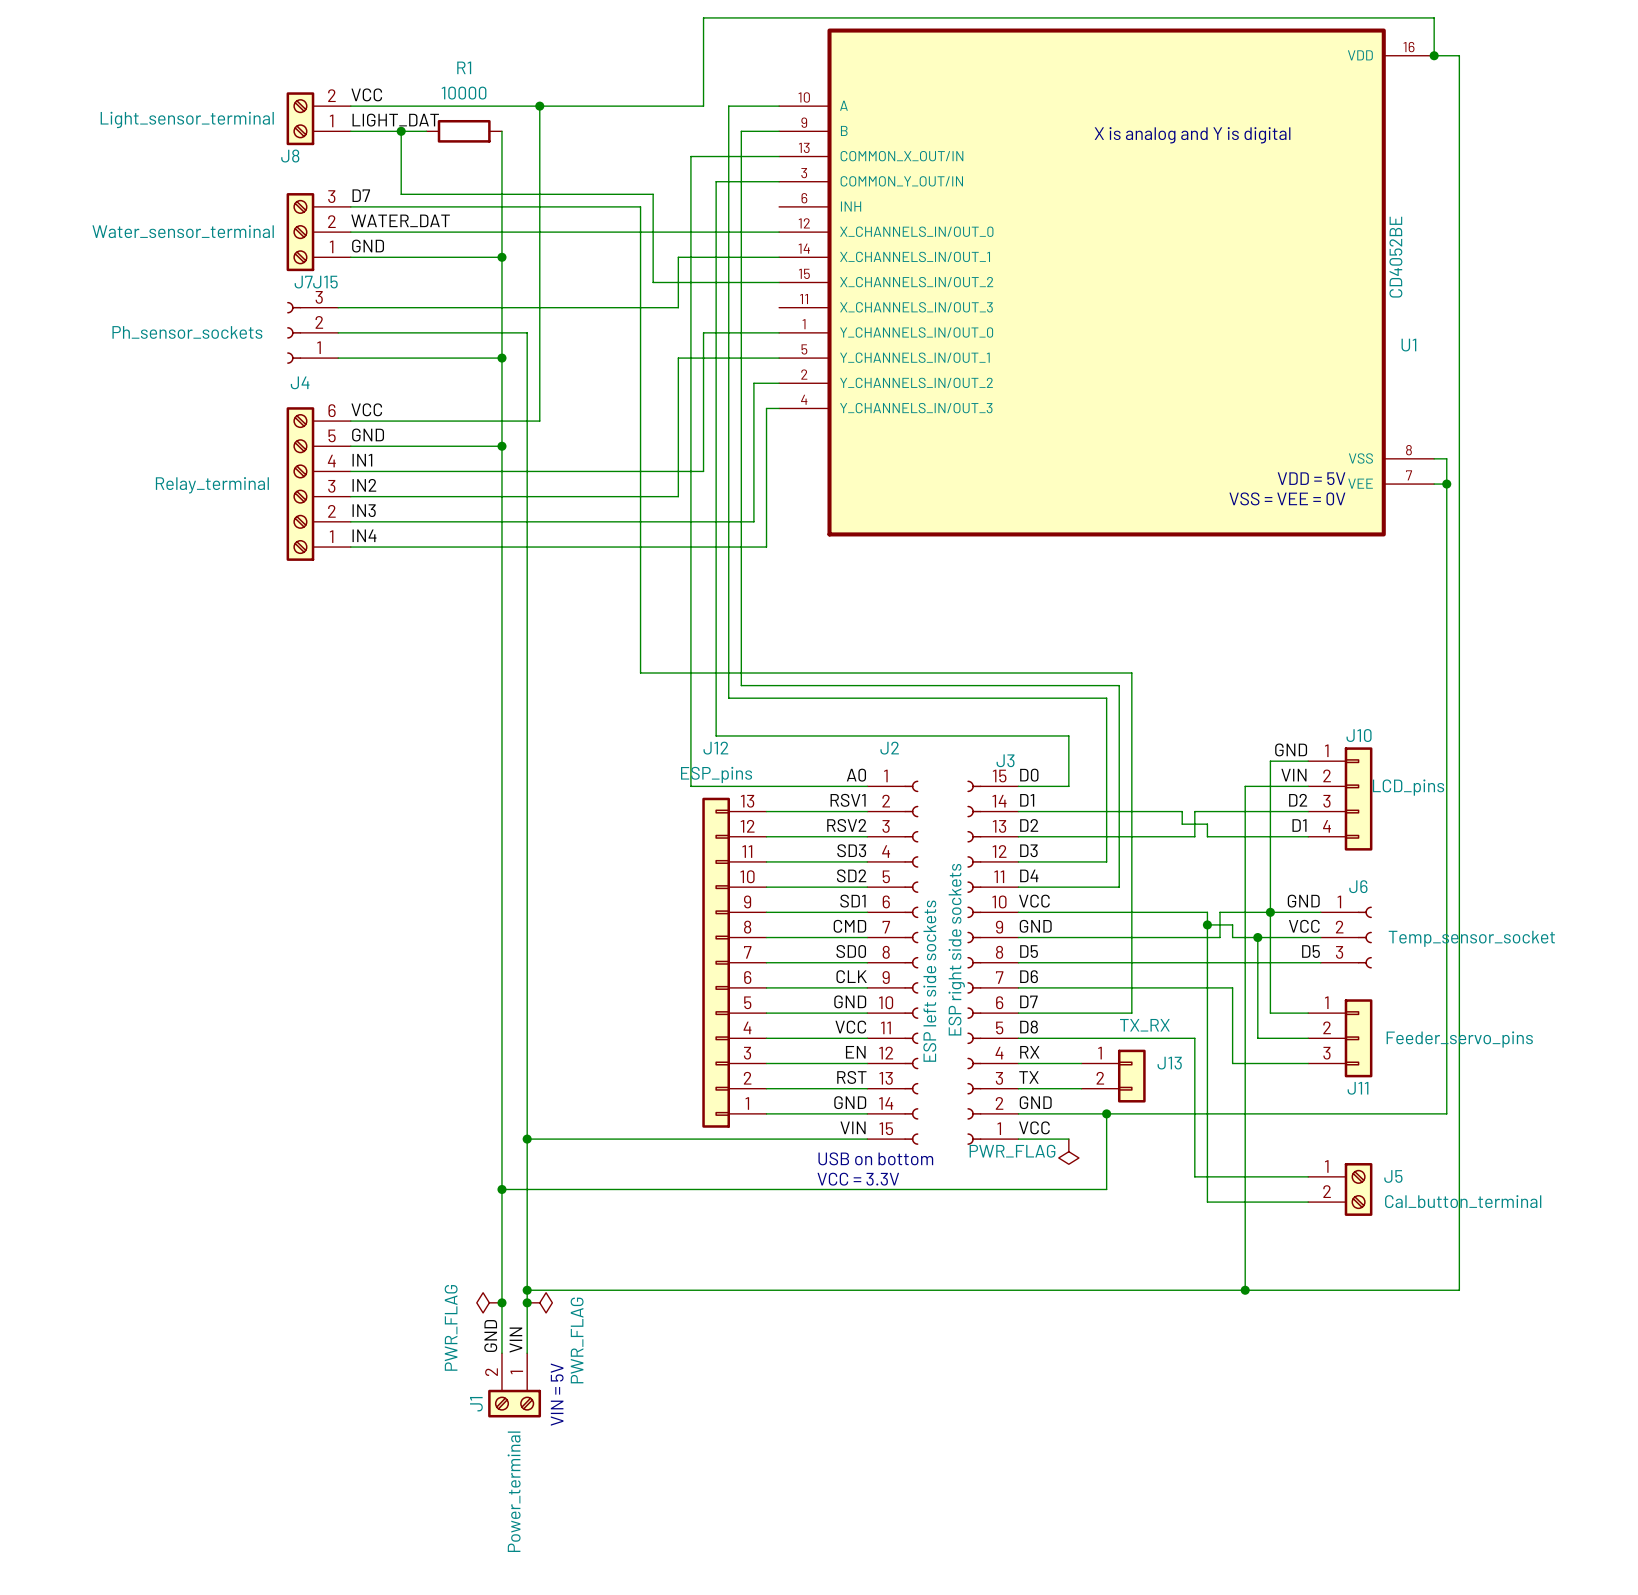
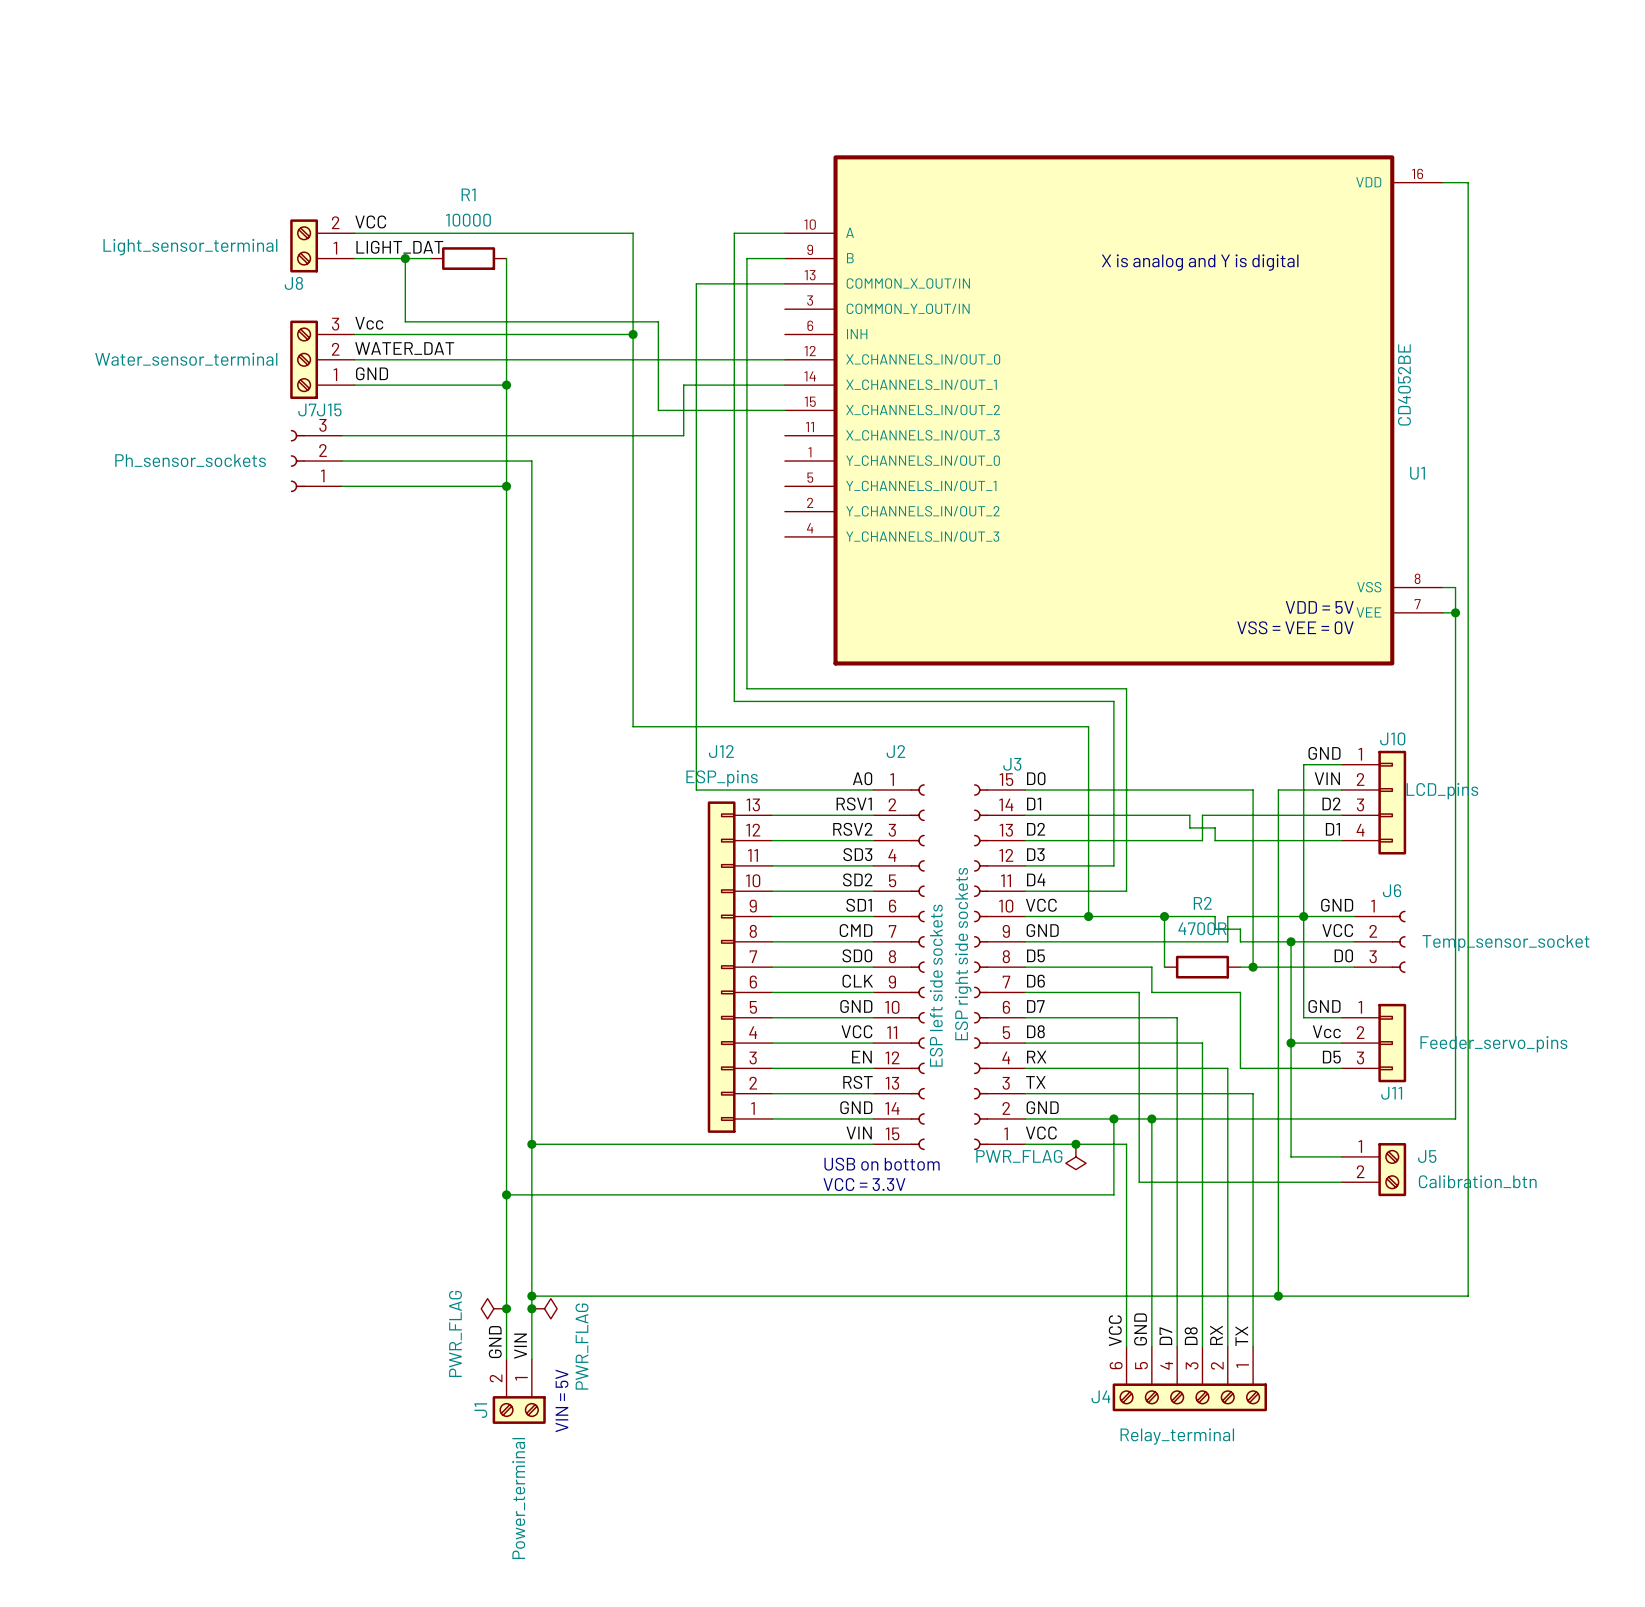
junction: (1434, 55) -> none
label: VCC (366, 94) -> none
wire: (350, 106) (703, 106) (703, 17) (1434, 17) (1434, 55) (1459, 55) (1459, 181) -> (1442, 182) (1468, 182)
wire: (539, 106) (539, 421) (350, 421) -> none
junction: (539, 106) -> none
wire: (779, 106) (728, 106) (728, 232) (627, 232) -> (1088, 916) (1088, 726) (633, 726) (633, 233)
J8 position: (318, 118) -> (322, 245)
label: LIGHT_DAT (395, 120) -> none
wire: (350, 131) (426, 131) -> none
wire: (401, 131) (401, 194) (653, 194) (653, 282) (690, 282) (690, 156) (779, 156) -> none
junction: (401, 131) -> none
R1 position: (464, 131) -> (468, 258)
wire: (501, 131) (501, 257) (426, 257) -> none
wire: (779, 131) (741, 131) (741, 257) (678, 257) (678, 307) (338, 307) -> none
text position: X is analog and Y is digital (1192, 135) -> X is analog and Y is digital (1200, 262)
wire: (779, 181) (716, 181) (716, 735) (1068, 735) (1068, 786) -> none
label: D7 (361, 195) -> none
wire: (350, 206) (640, 206) (640, 673) (1131, 673) (1131, 987) (1144, 987) -> none
label: WATER_DAT (400, 220) -> VCC (370, 221)
J7 position: (318, 232) -> (322, 359)
label: GND (368, 246) -> LIGHT_DAT (399, 247)
junction: none -> (405, 258)
junction: (501, 257) -> none
U1 position: (1106, 282) -> (1113, 410)
label: none -> Vcc (369, 323)
J15 position: (312, 332) -> (316, 461)
wire: (527, 332) (527, 458) -> (531, 334) (633, 334)
junction: none -> (633, 334)
wire: (779, 332) (703, 332) (703, 471) (350, 471) -> none
label: none -> WATER_DAT (404, 348)
wire: none -> (506, 359) (683, 359)
junction position: (501, 358) -> (506, 385)
wire: (678, 358) (678, 383) -> (759, 385) (683, 385)
wire: (753, 383) (753, 521) (350, 521) -> none
wire: (766, 408) (766, 547) (350, 547) -> (772, 410) (658, 410) (658, 321) (405, 321) (405, 258)
label: VCC (366, 409) -> none
wire: (678, 433) (678, 496) (350, 496) -> (683, 435) (342, 435)
label position: GND (368, 435) -> GND (372, 373)
wire: (350, 446) (501, 446) -> (354, 385) (506, 385)
junction: (501, 446) -> none
wire: none -> (342, 461) (531, 461)
wire: (1434, 458) (1446, 458) (1446, 584) -> (1442, 587) (1455, 587)
label: IN1 (362, 460) -> none
text position: VDD = 5V (1311, 478) -> VDD = 5V (1319, 607)
J4 rotation: 0° (300, 484) -> 90° counterclockwise (1189, 1397)
J4 position: (318, 484) -> (1189, 1379)
wire: none -> (342, 486) (506, 486)
junction: none -> (506, 486)
wire: (1434, 484) (1446, 484) -> (1442, 612) (1455, 612)
junction: (1446, 484) -> none
J4 value position: Relay_terminal (212, 485) -> Relay_terminal (1177, 1436)
label: IN2 (364, 485) -> none
text position: VSS = VEE = 0V (1287, 498) -> VSS = VEE = 0V (1295, 627)
label: IN3 (364, 510) -> none
label: IN4 (364, 535) -> none
junction: none -> (1455, 612)
label position: GND (1291, 749) -> GND (1324, 753)
wire: (1295, 761) (1270, 761) (1270, 786) (1245, 786) -> (1075, 790) (1253, 790)
label position: VIN (1293, 775) -> VIN (1327, 778)
J10 position: (1340, 798) -> (1373, 802)
label position: D2 (1298, 800) -> D2 (1331, 803)
label position: D1 (1299, 825) -> D1 (1332, 829)
label position: GND (1303, 901) -> GND (1337, 905)
junction: none -> (1088, 916)
wire: none -> (1164, 916) (1164, 967)
junction: none -> (1164, 916)
junction: (1270, 912) -> none
junction: none -> (1303, 916)
wire: (1207, 924) (1207, 1202) (1308, 1202) -> none
junction: (1207, 924) -> none
label position: VCC (1304, 926) -> VCC (1337, 930)
wire: (1257, 937) (1257, 1038) (1283, 1038) -> none
junction: (1257, 937) -> none
wire: none -> (1291, 941) (1291, 1156) (1341, 1156)
junction: none -> (1291, 941)
J6 position: (1346, 937) -> (1379, 941)
label position: D5 (1311, 951) -> D5 (1331, 1057)
label: none -> D0 (1343, 955)
wire: (1144, 962) (1232, 962) -> (1151, 967) (1151, 992)
R2: none -> 4700R (1202, 967)
wire: (1245, 962) (1245, 1088) -> (1088, 1093) (1253, 1093)
junction: none -> (1253, 967)
label: none -> GND (1324, 1006)
wire: (1270, 1013) (1295, 1013) -> (1303, 764) (1303, 1017)
wire: none -> (1278, 1017) (1278, 1296)
label: none -> Vcc (1326, 1031)
junction: none -> (1291, 1043)
J11 position: (1340, 1038) -> (1373, 1043)
wire: none -> (1088, 1068) (1227, 1068) (1227, 1346)
J13: TX_RX (1113, 1076) -> none
wire: none -> (1151, 1118) (1151, 1346)
junction: none -> (1151, 1118)
wire: none -> (1075, 1144) (1126, 1144) (1126, 1346)
junction: none -> (1075, 1144)
J5 position: (1340, 1189) -> (1373, 1169)
J5 value: Cal_button_terminal (1463, 1201) -> Calibration_btn (1477, 1181)
wire: none -> (1253, 1296) (1253, 1346)
junction position: (1245, 1290) -> (1278, 1296)
label: none -> GND (1140, 1329)
label: none -> VCC (1115, 1330)
label: none -> RX (1216, 1335)
label: none -> D7 (1165, 1336)
label: none -> D8 (1191, 1336)
label: none -> TX (1241, 1336)
wire: none -> (1177, 1346) (1177, 1017) (1139, 1017) (1139, 1182) (1202, 1182) (1202, 1346)

